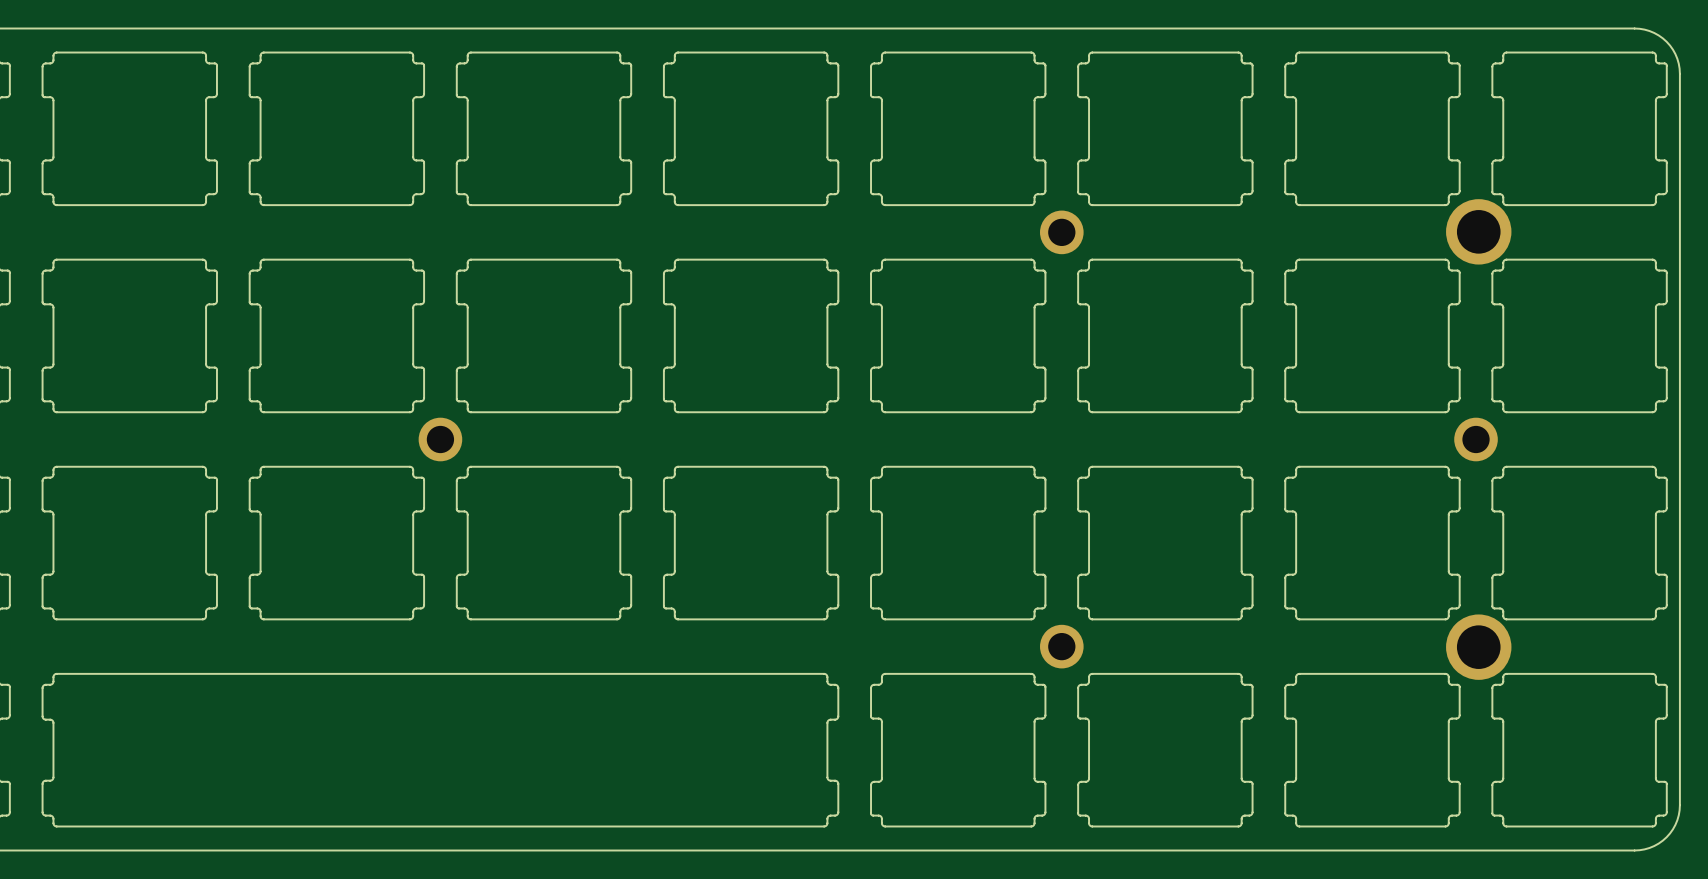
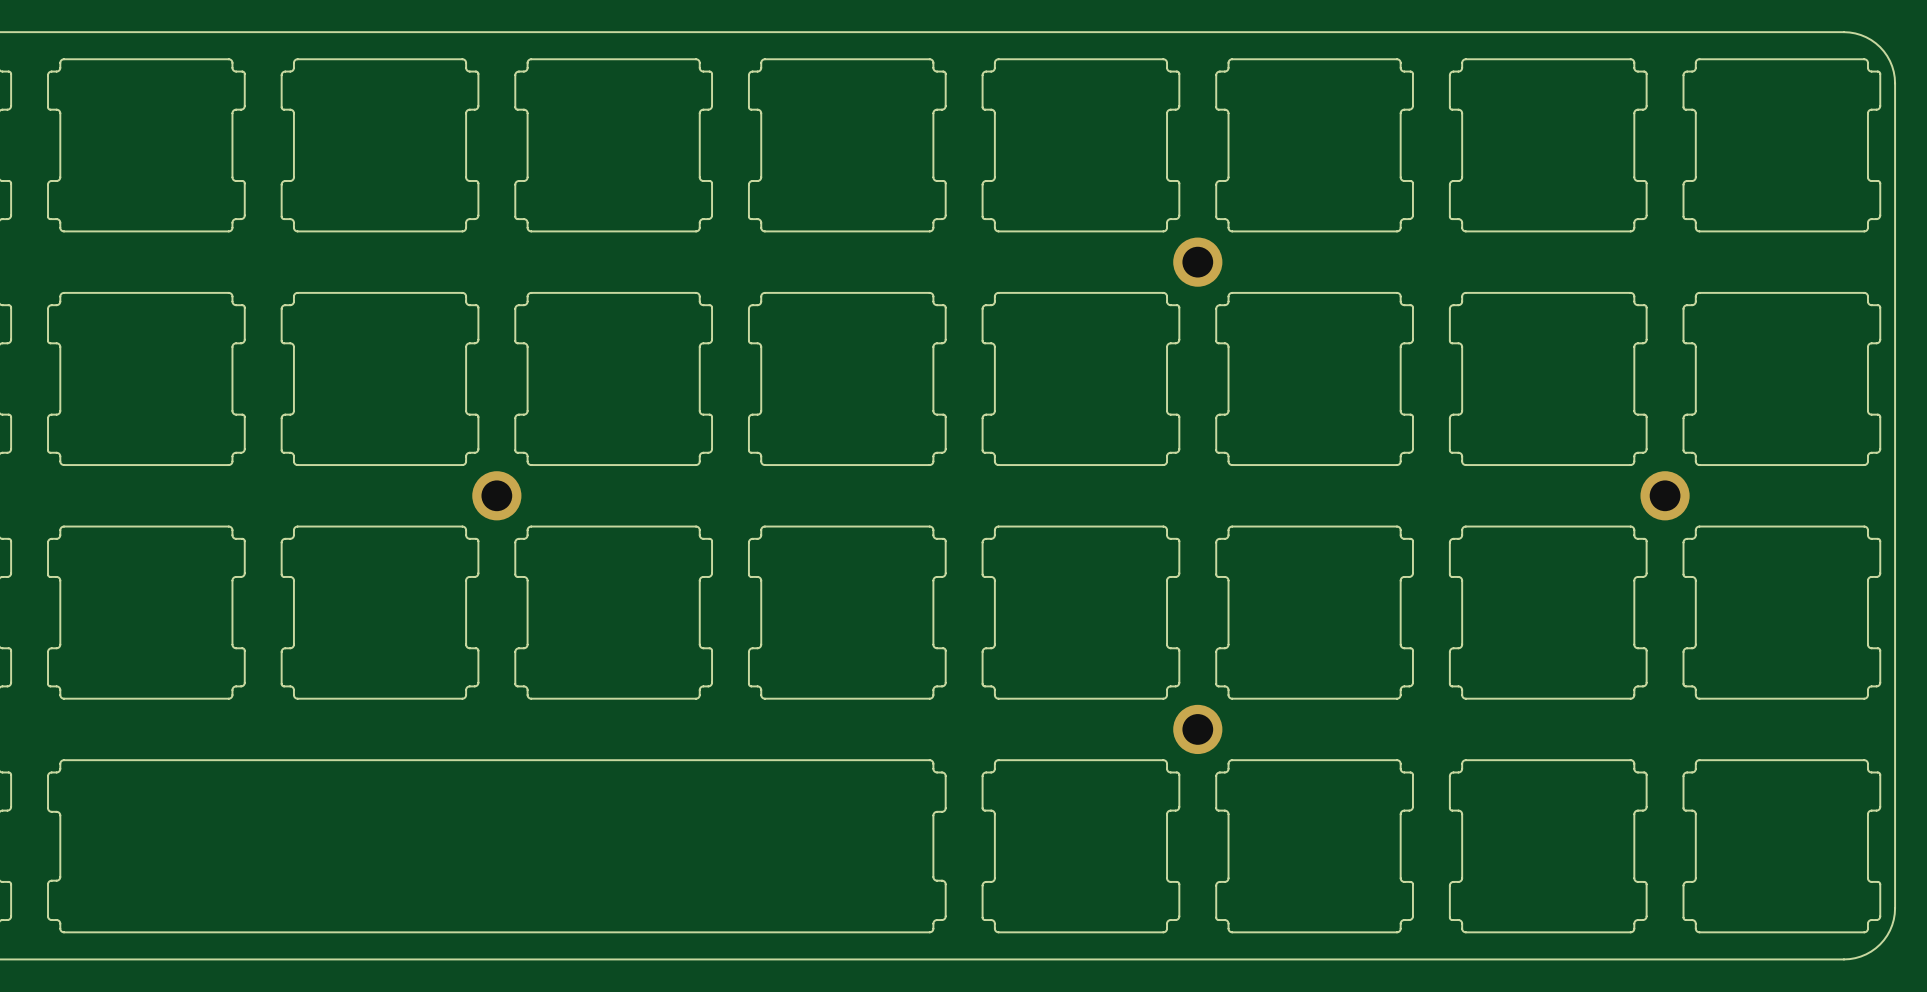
via: (1478, 231) -> none
via: (1478, 647) -> none

